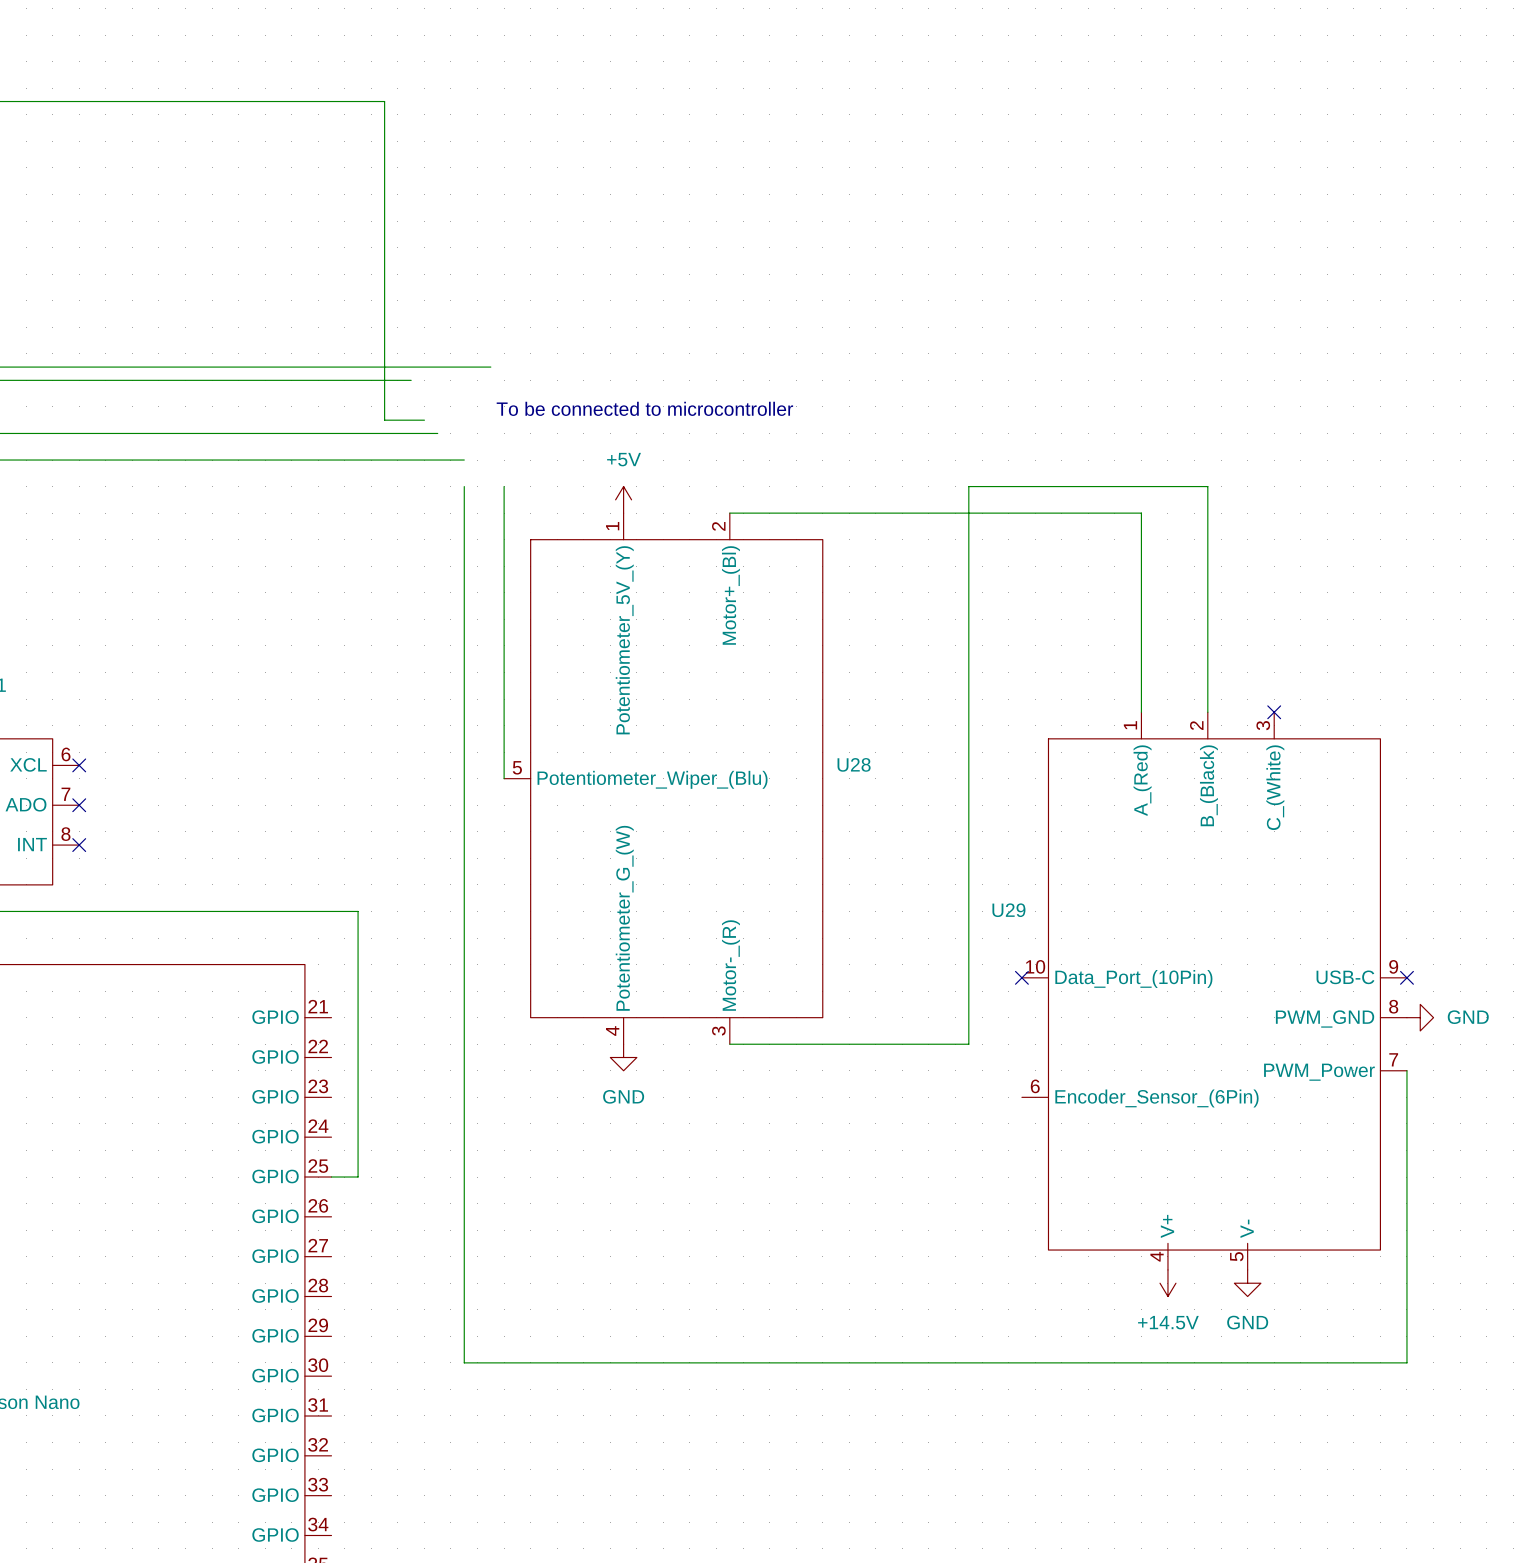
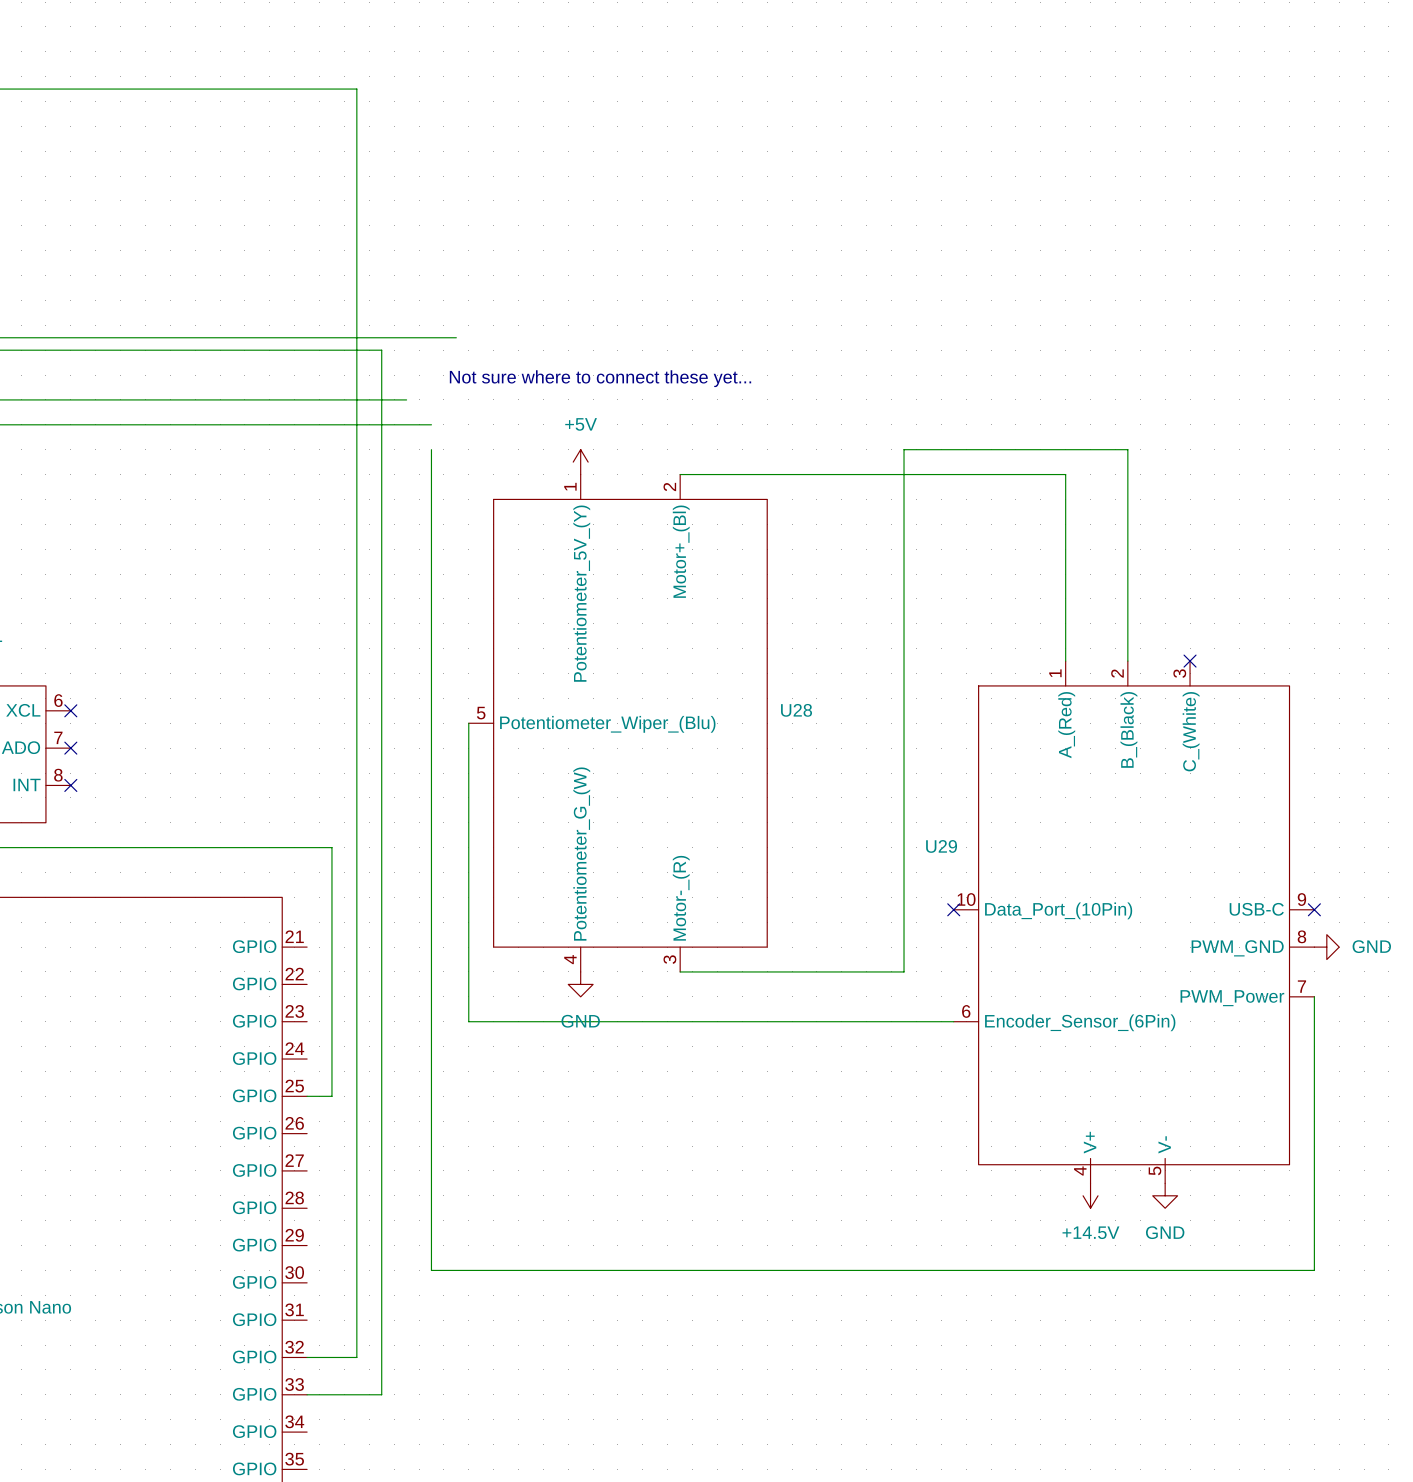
wire: none -> (381, 350) (381, 1394) (307, 1394)
text: To be connected to microcontroller (644, 408) -> Not sure where to connect these yet... (600, 378)
wire: (384, 420) (424, 420) -> (356, 387) (356, 1357) (307, 1357)
wire: (504, 486) (504, 778) -> (953, 1021) (468, 1021) (468, 723)

